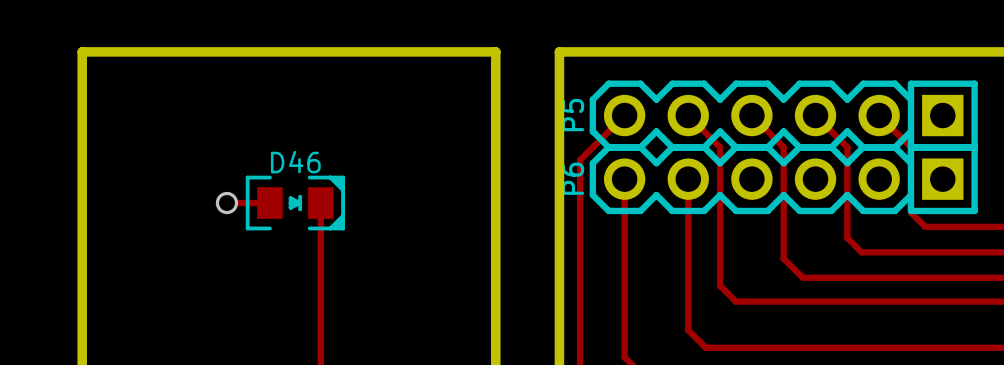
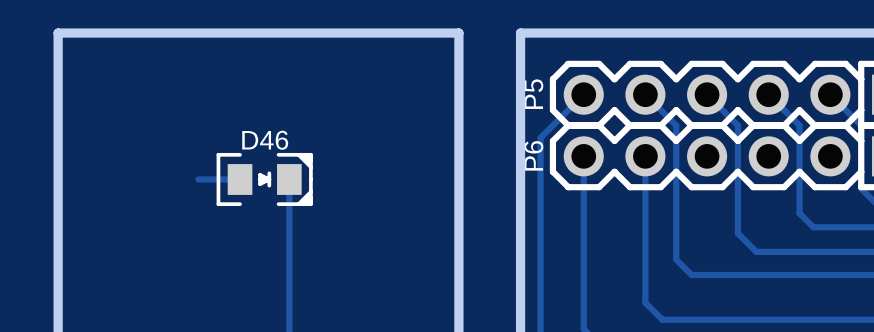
via: (226, 203) -> none

